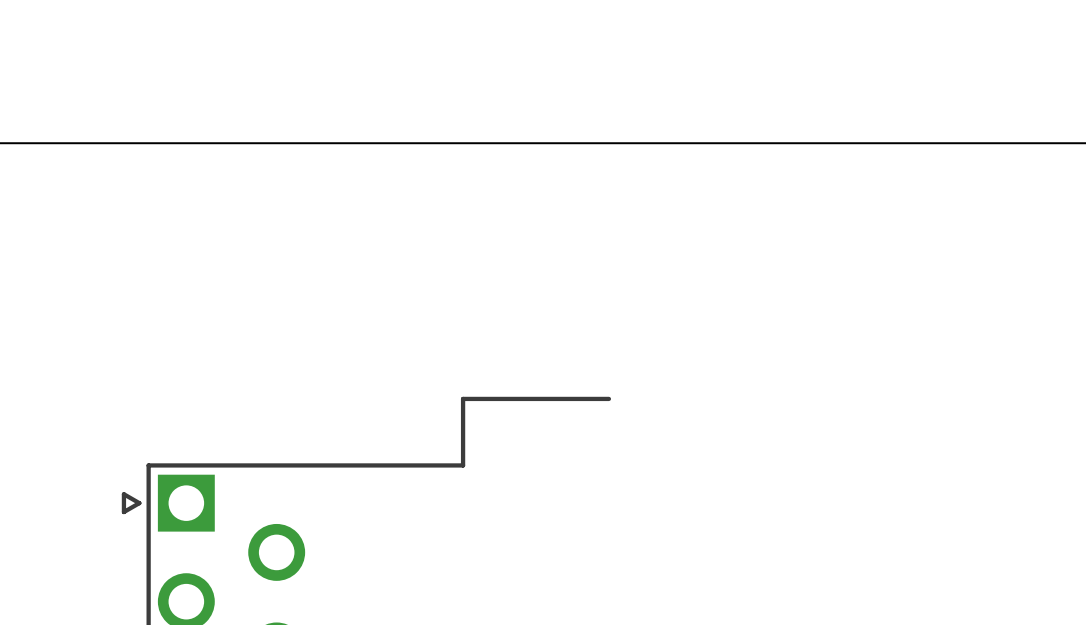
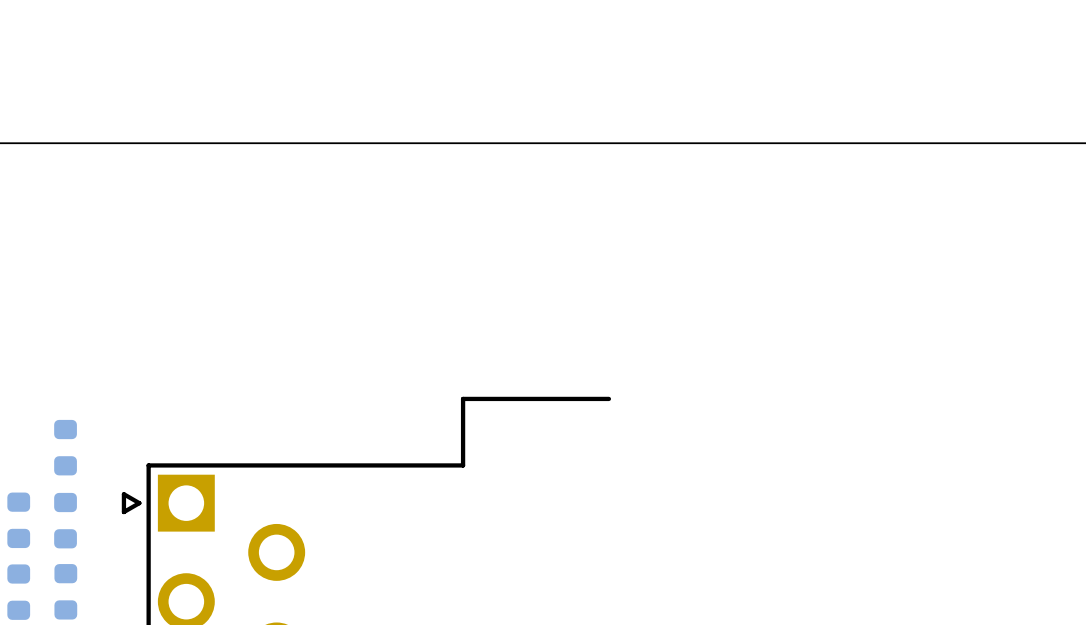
part: none -> (65, 447)
part: none -> (18, 520)
part: none -> (65, 520)
part: none -> (65, 591)
part: none -> (18, 592)

